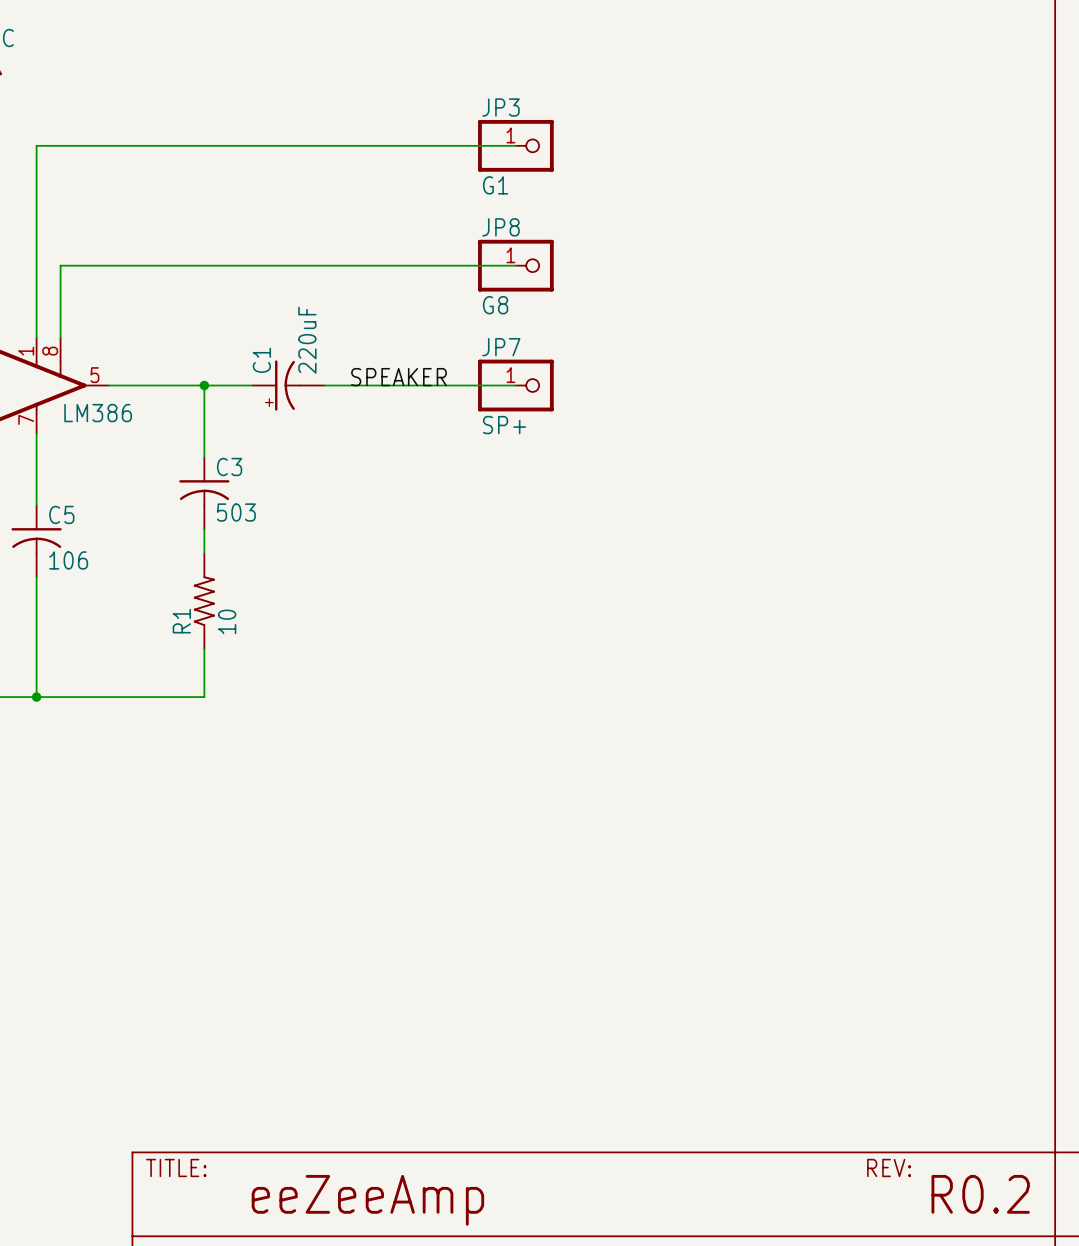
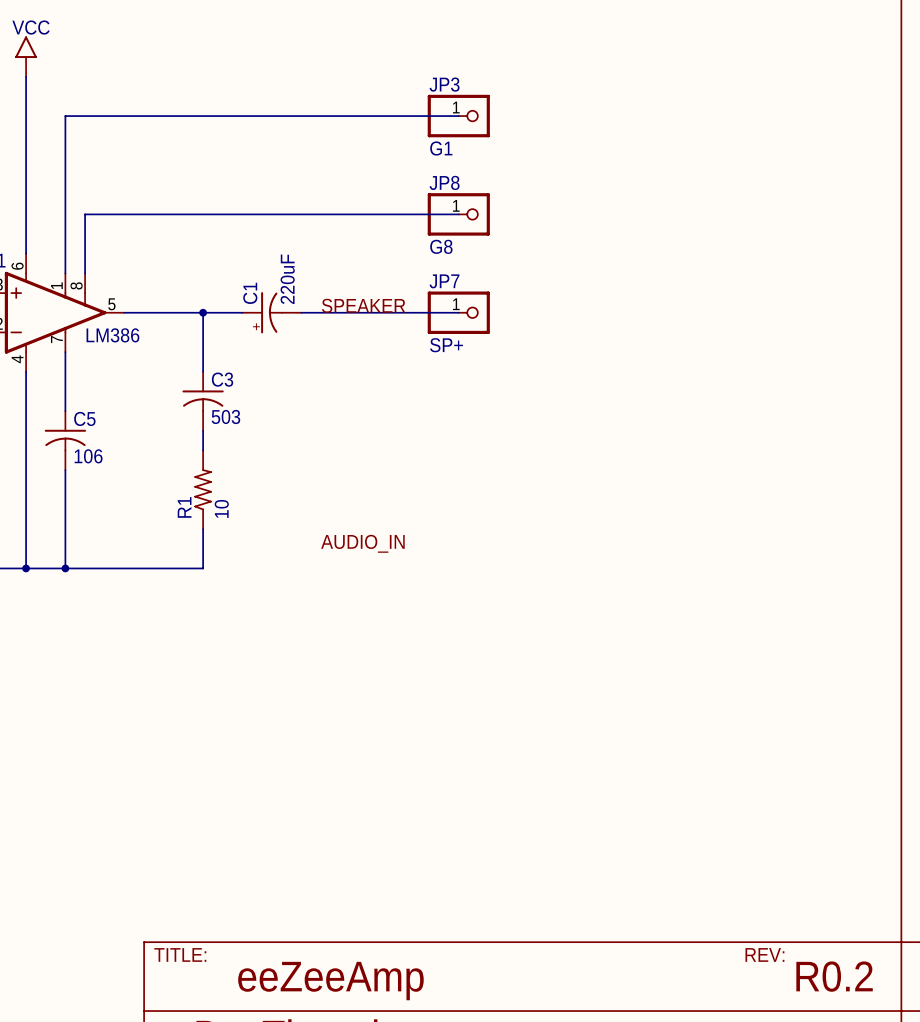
label: none -> AUDIO_IN (362, 543)

